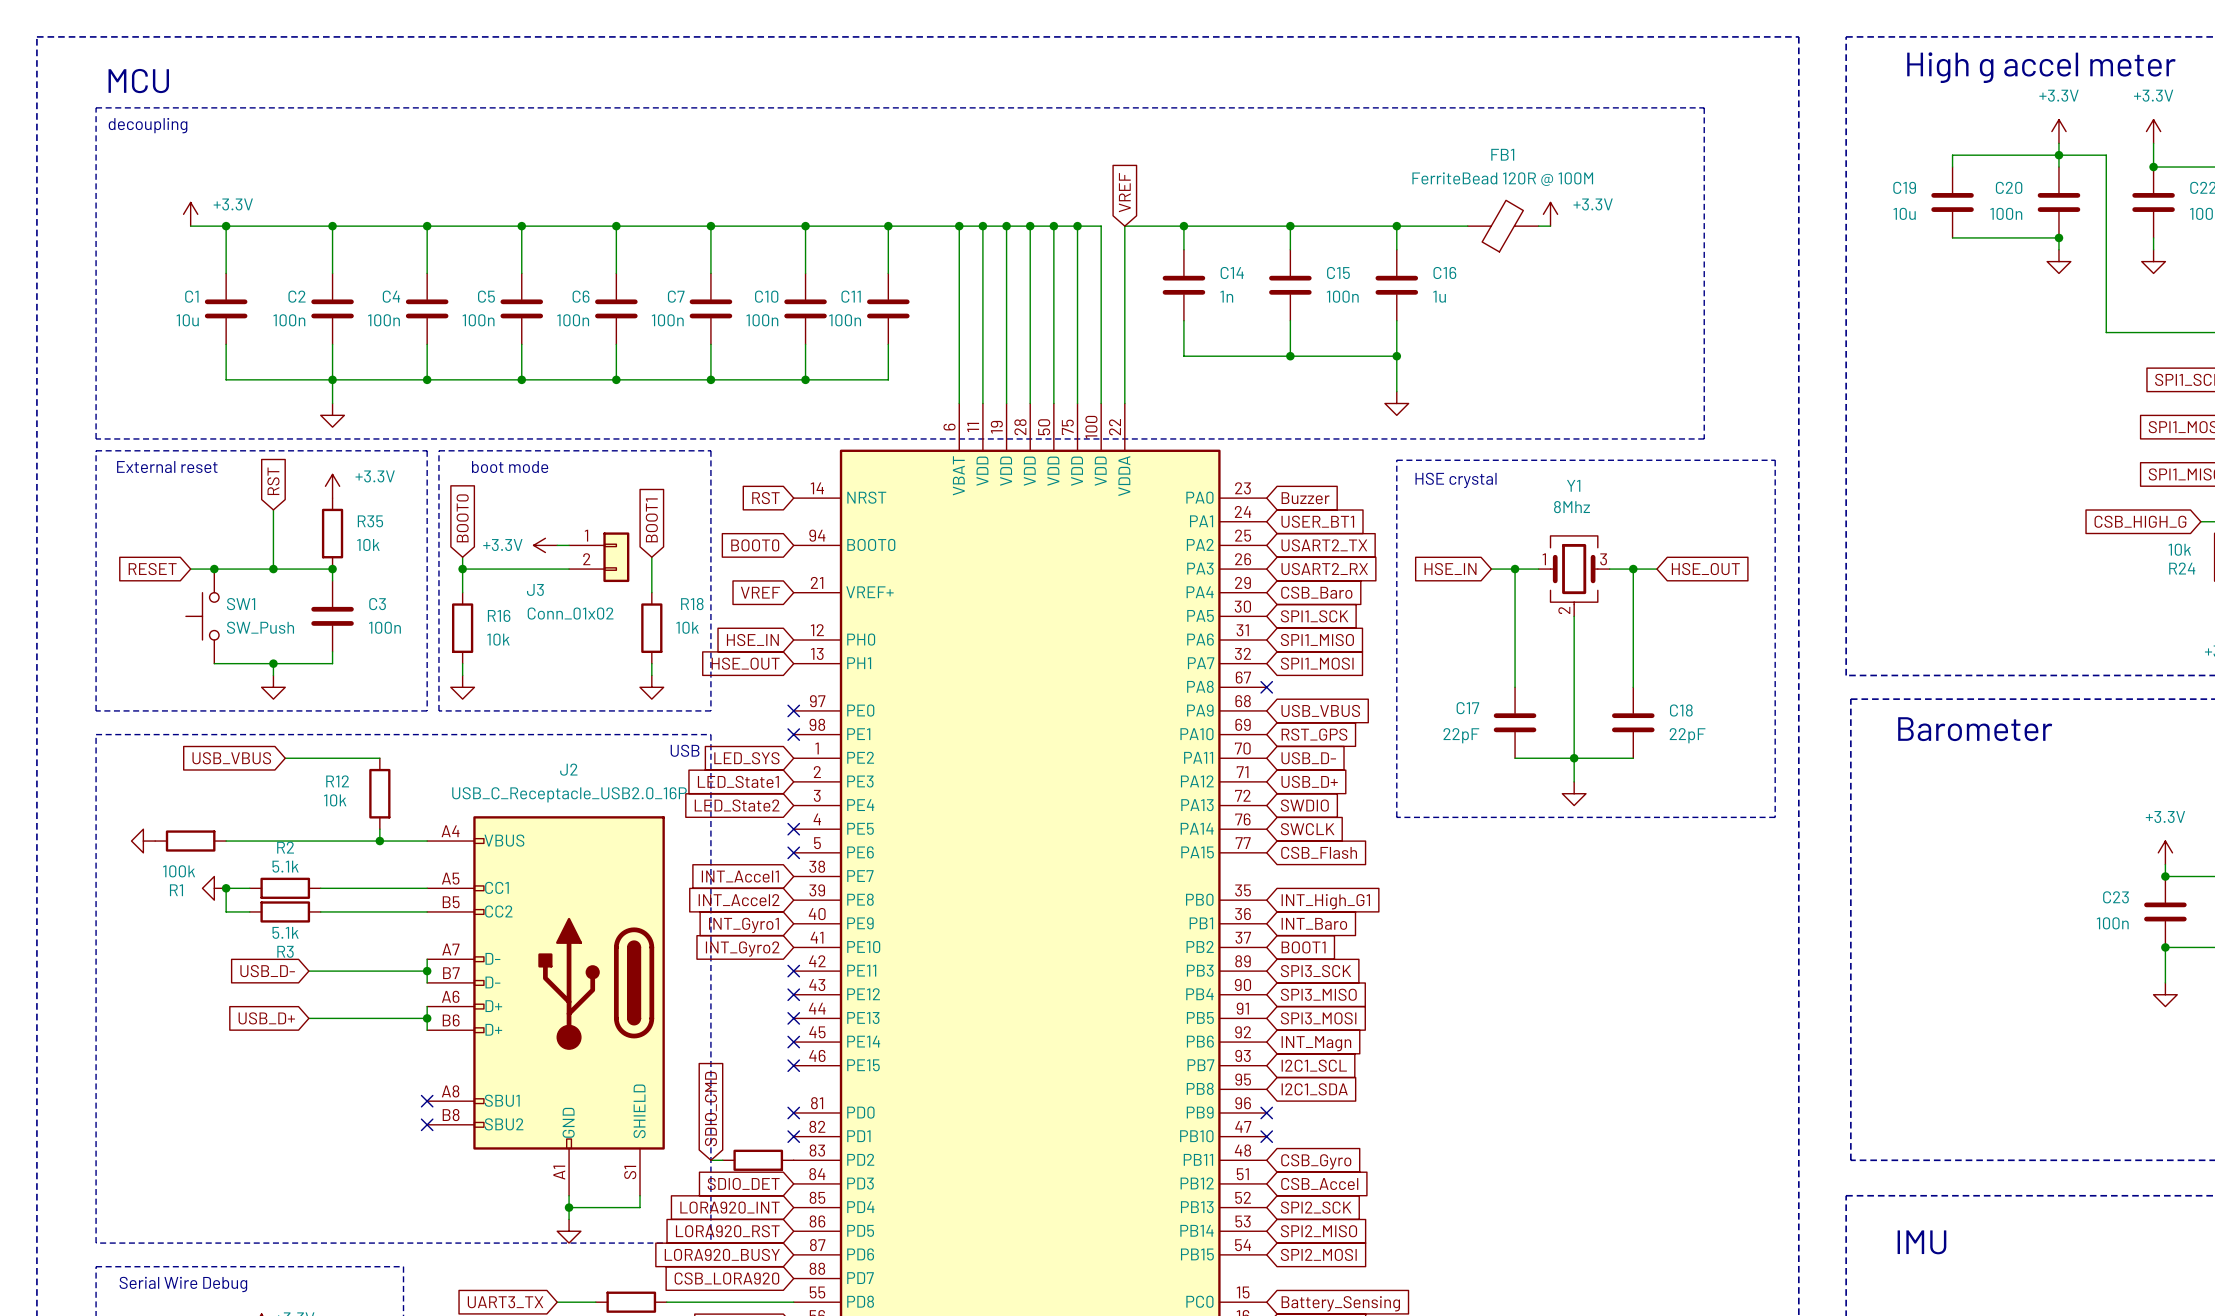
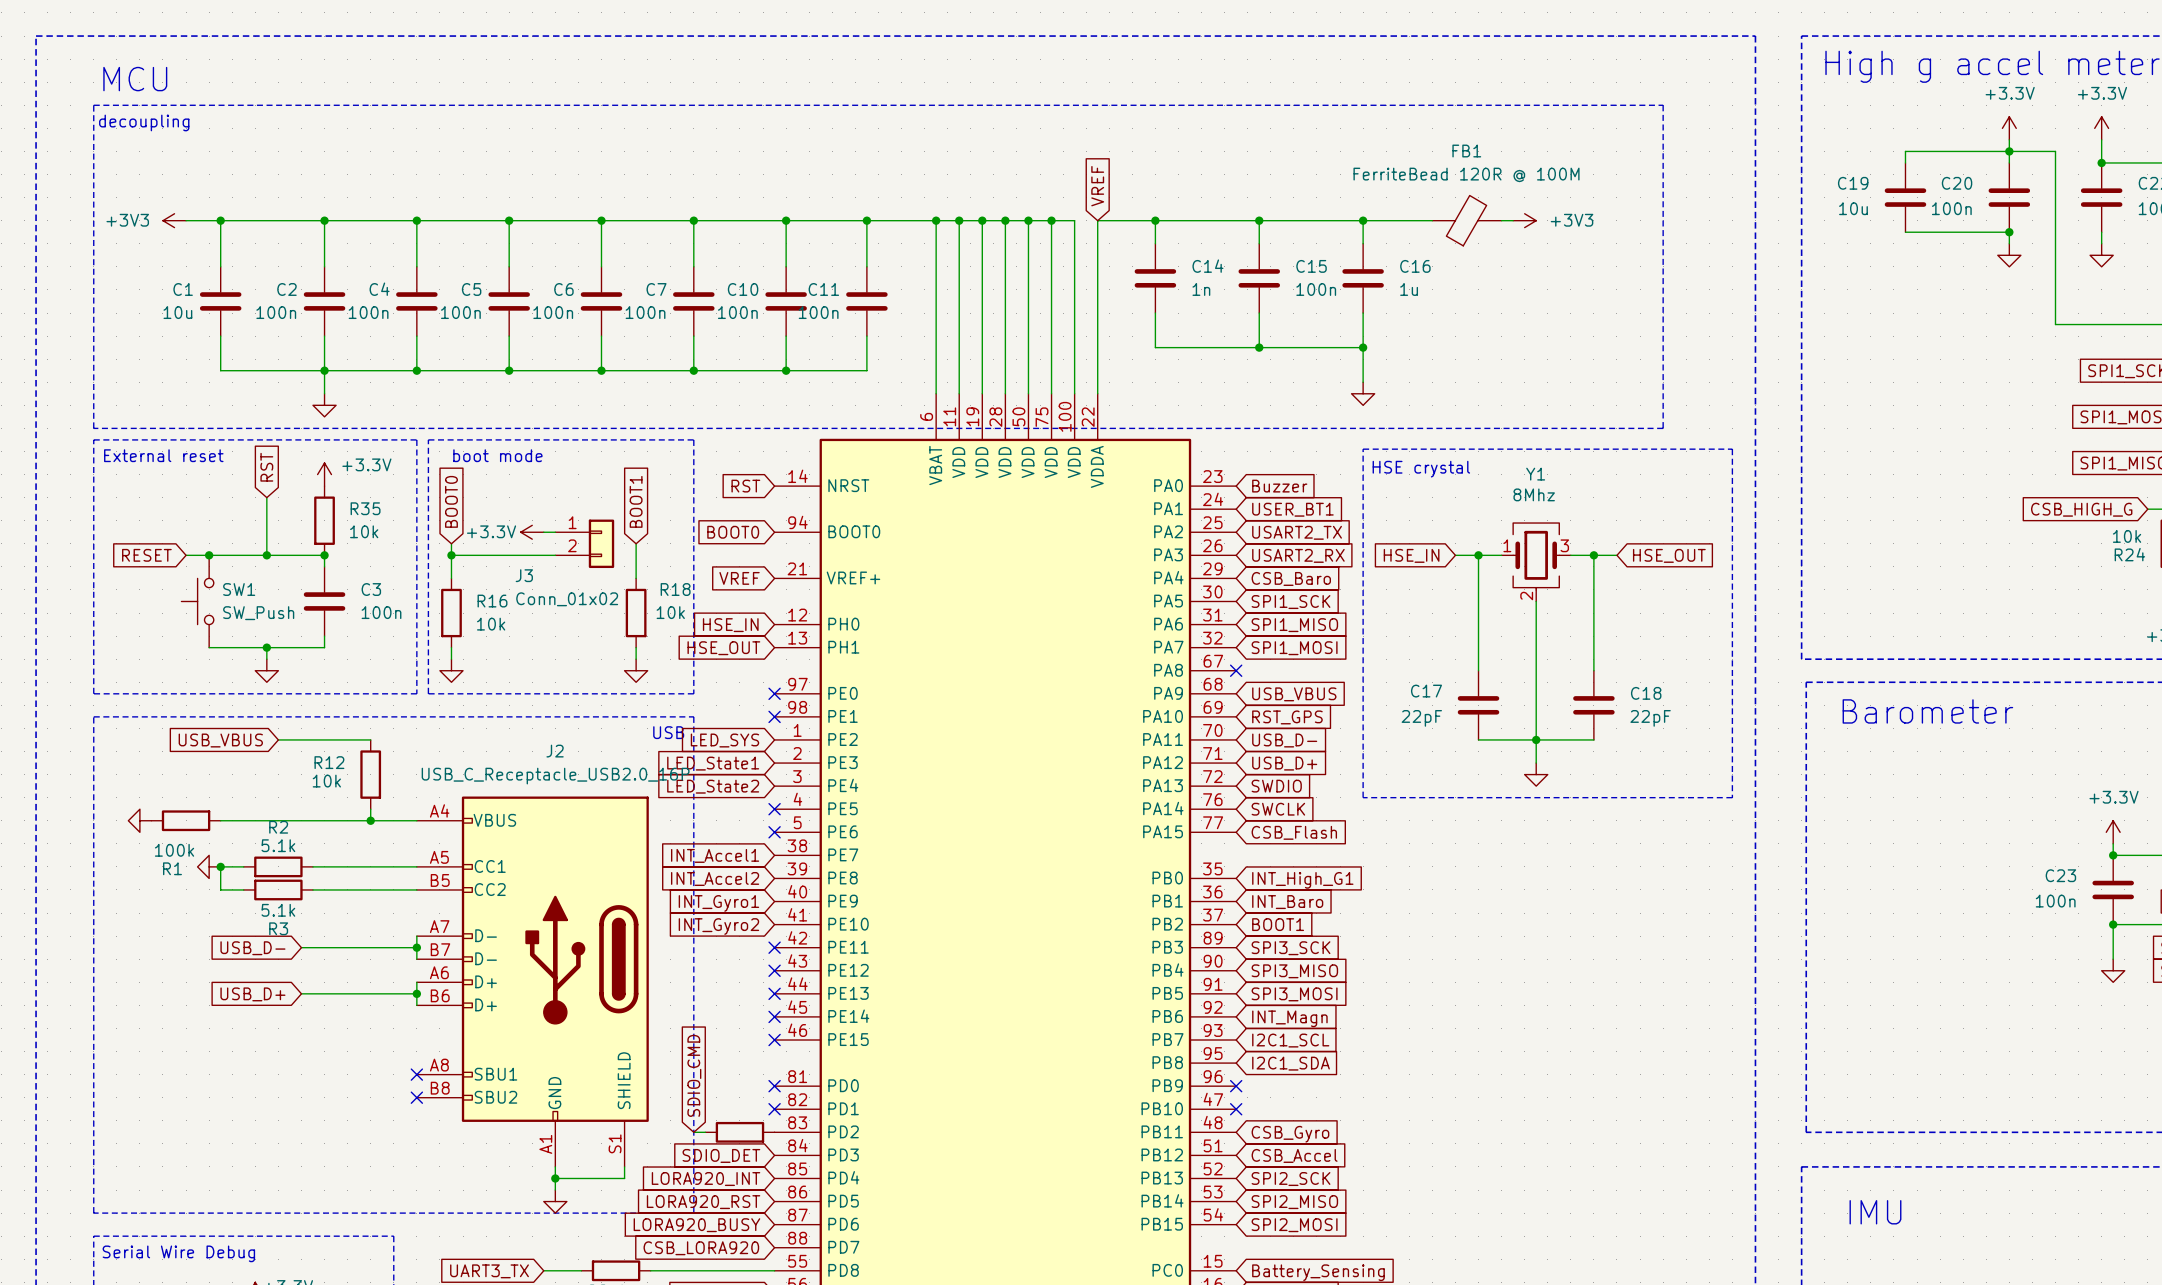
power symbol: +3.3V (190, 214) -> none
power symbol: +3.3V (1550, 214) -> none
power symbol: none -> +3V3 (174, 220)
power symbol: none -> +3V3 (1524, 220)

